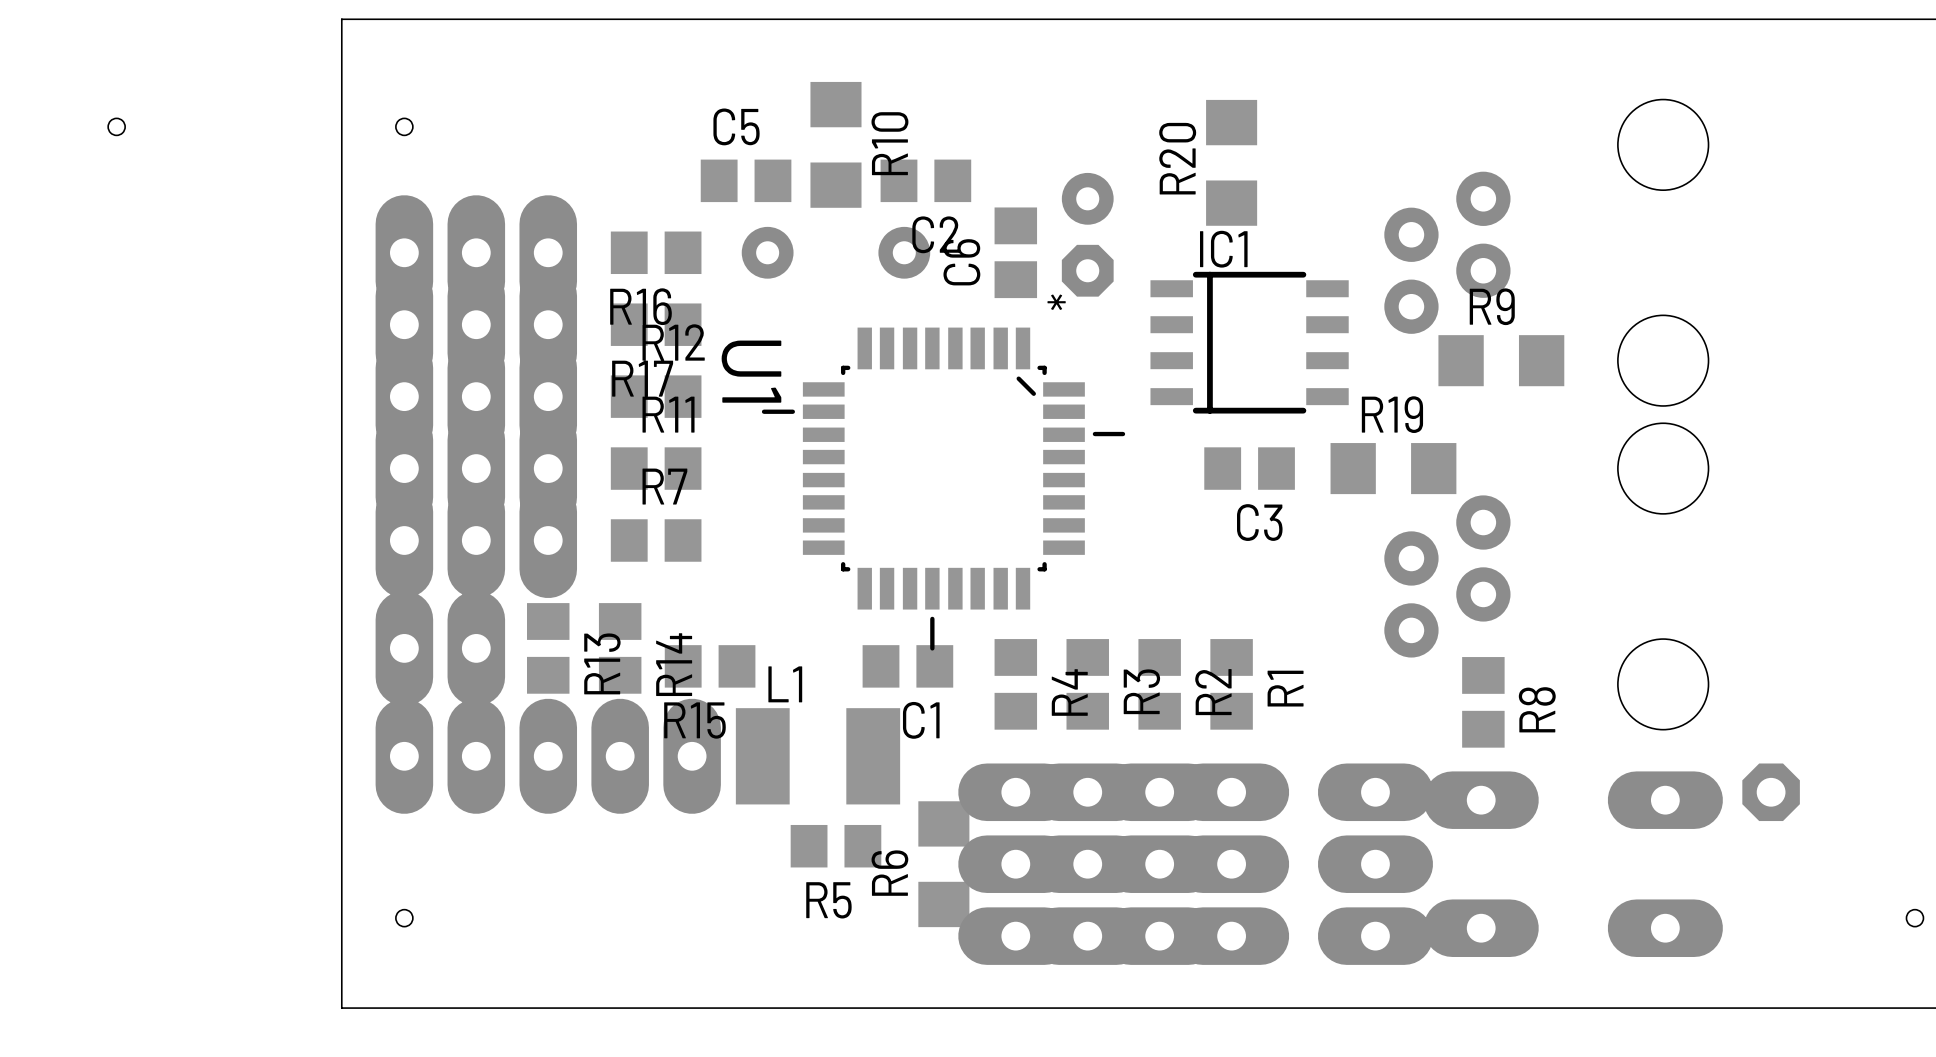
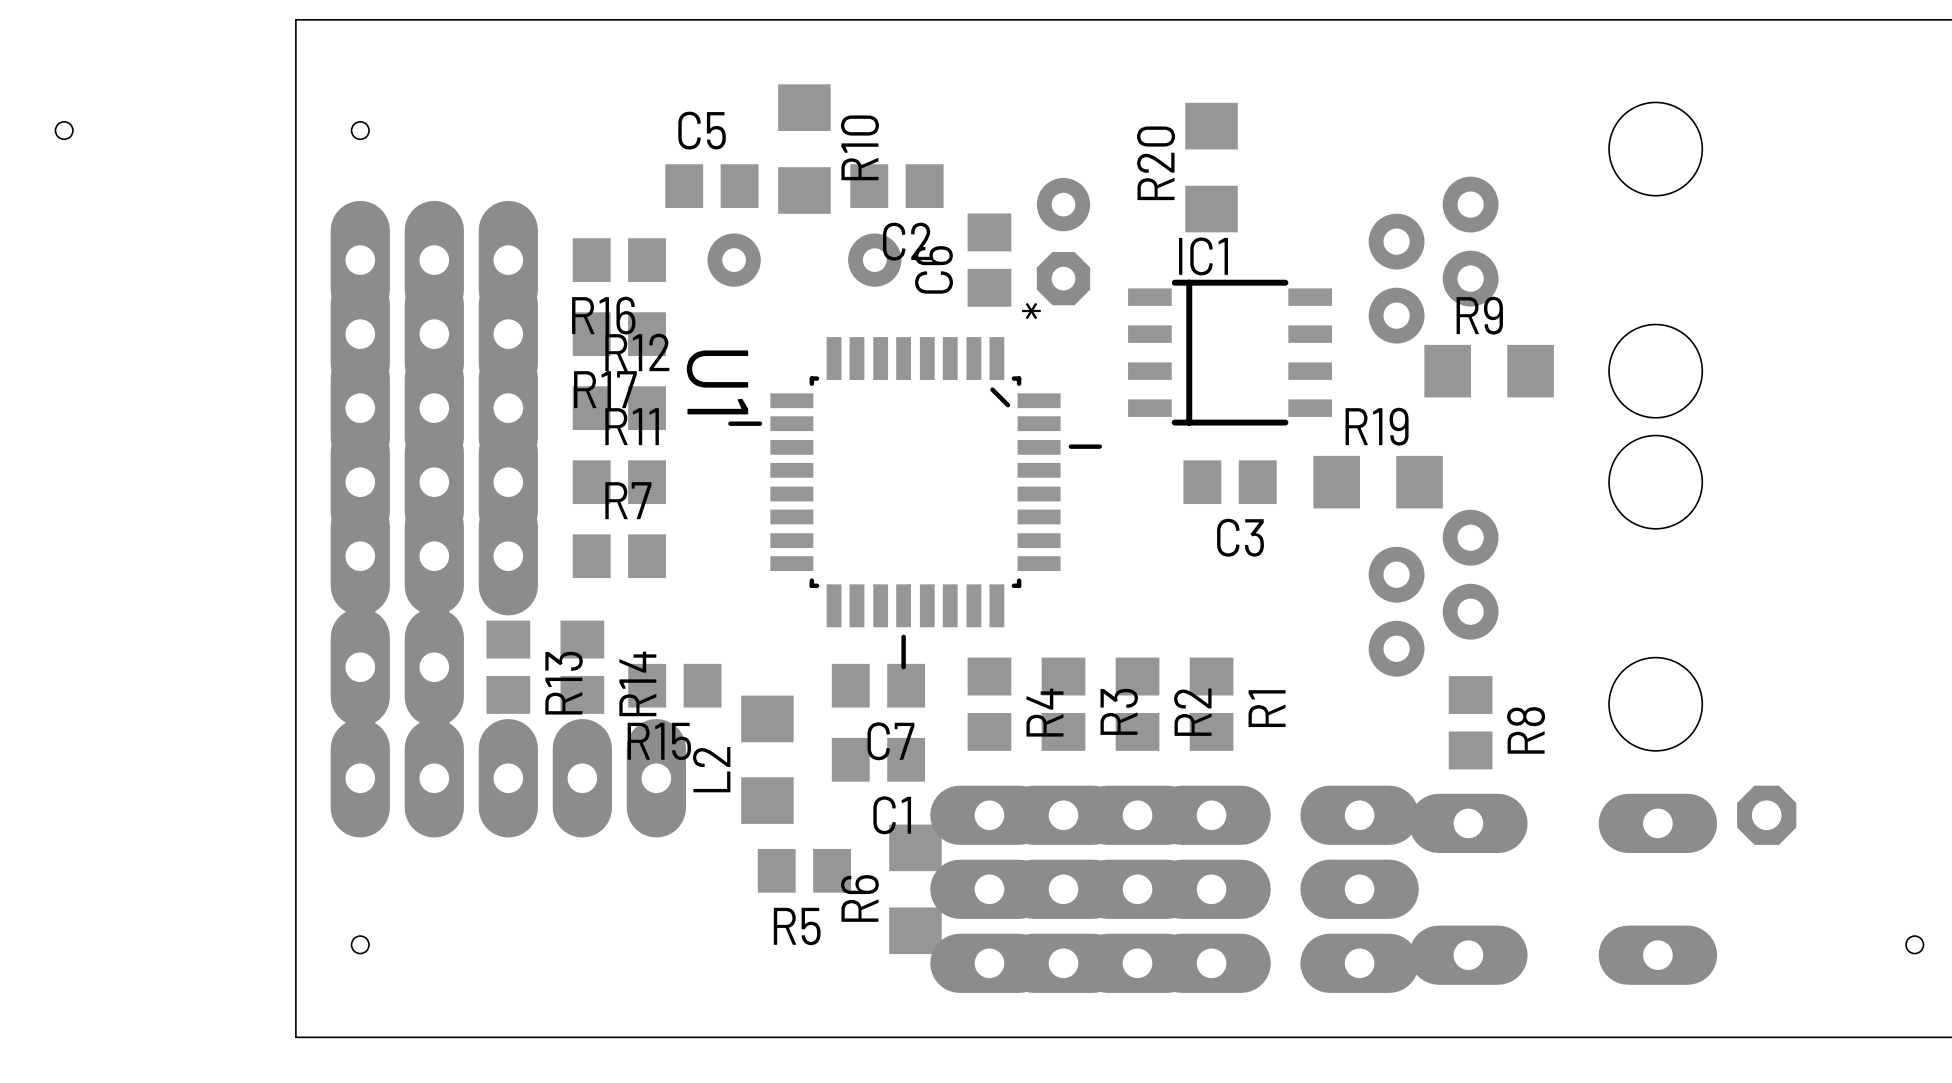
C1 name: C1 (921, 720) -> C7 (890, 741)
L2: none -> (767, 759)
C1: none -> (878, 759)
L1: (817, 756) -> none

